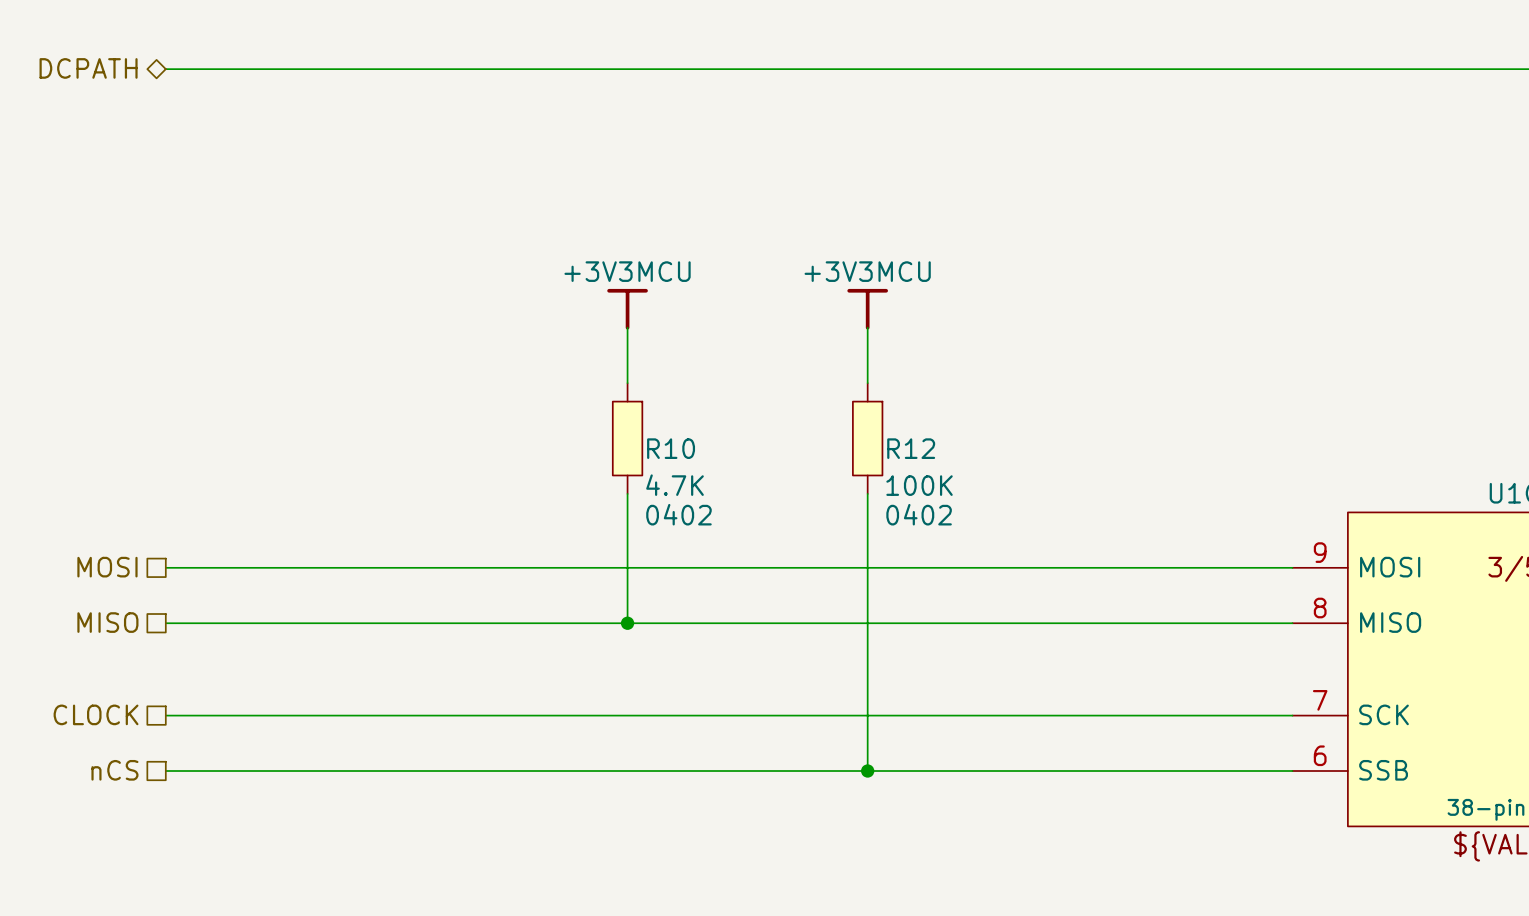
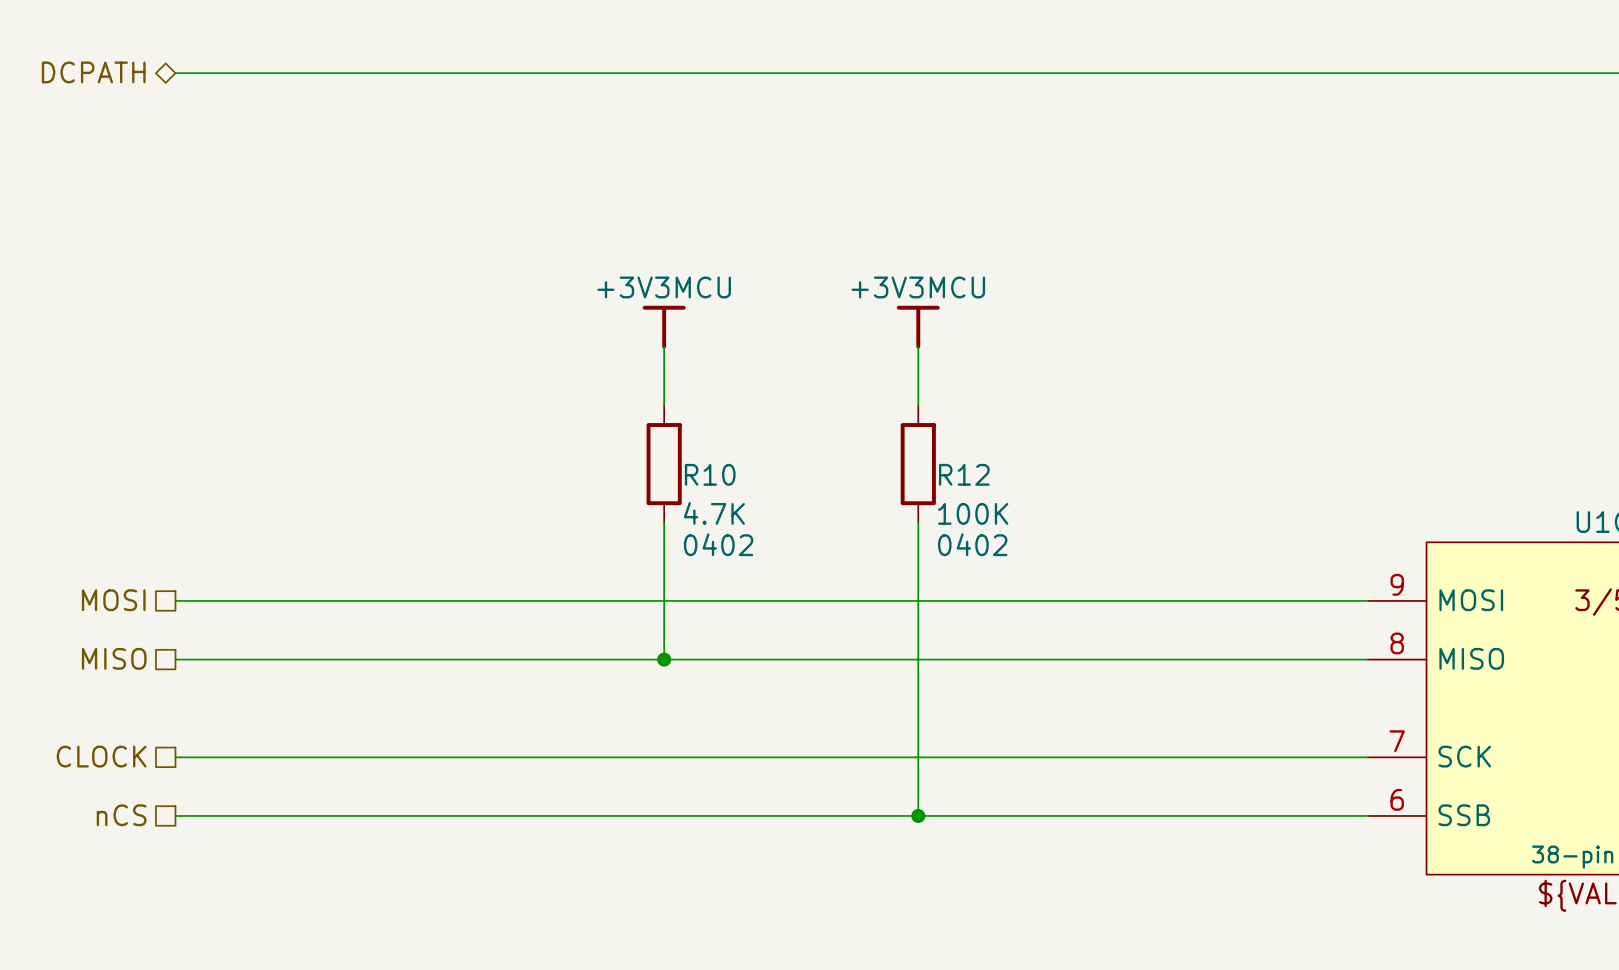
R10 symbol: [612, 383, 643, 494] -> [646, 405, 682, 523]
R12 symbol: [852, 383, 883, 494] -> [900, 405, 936, 523]

